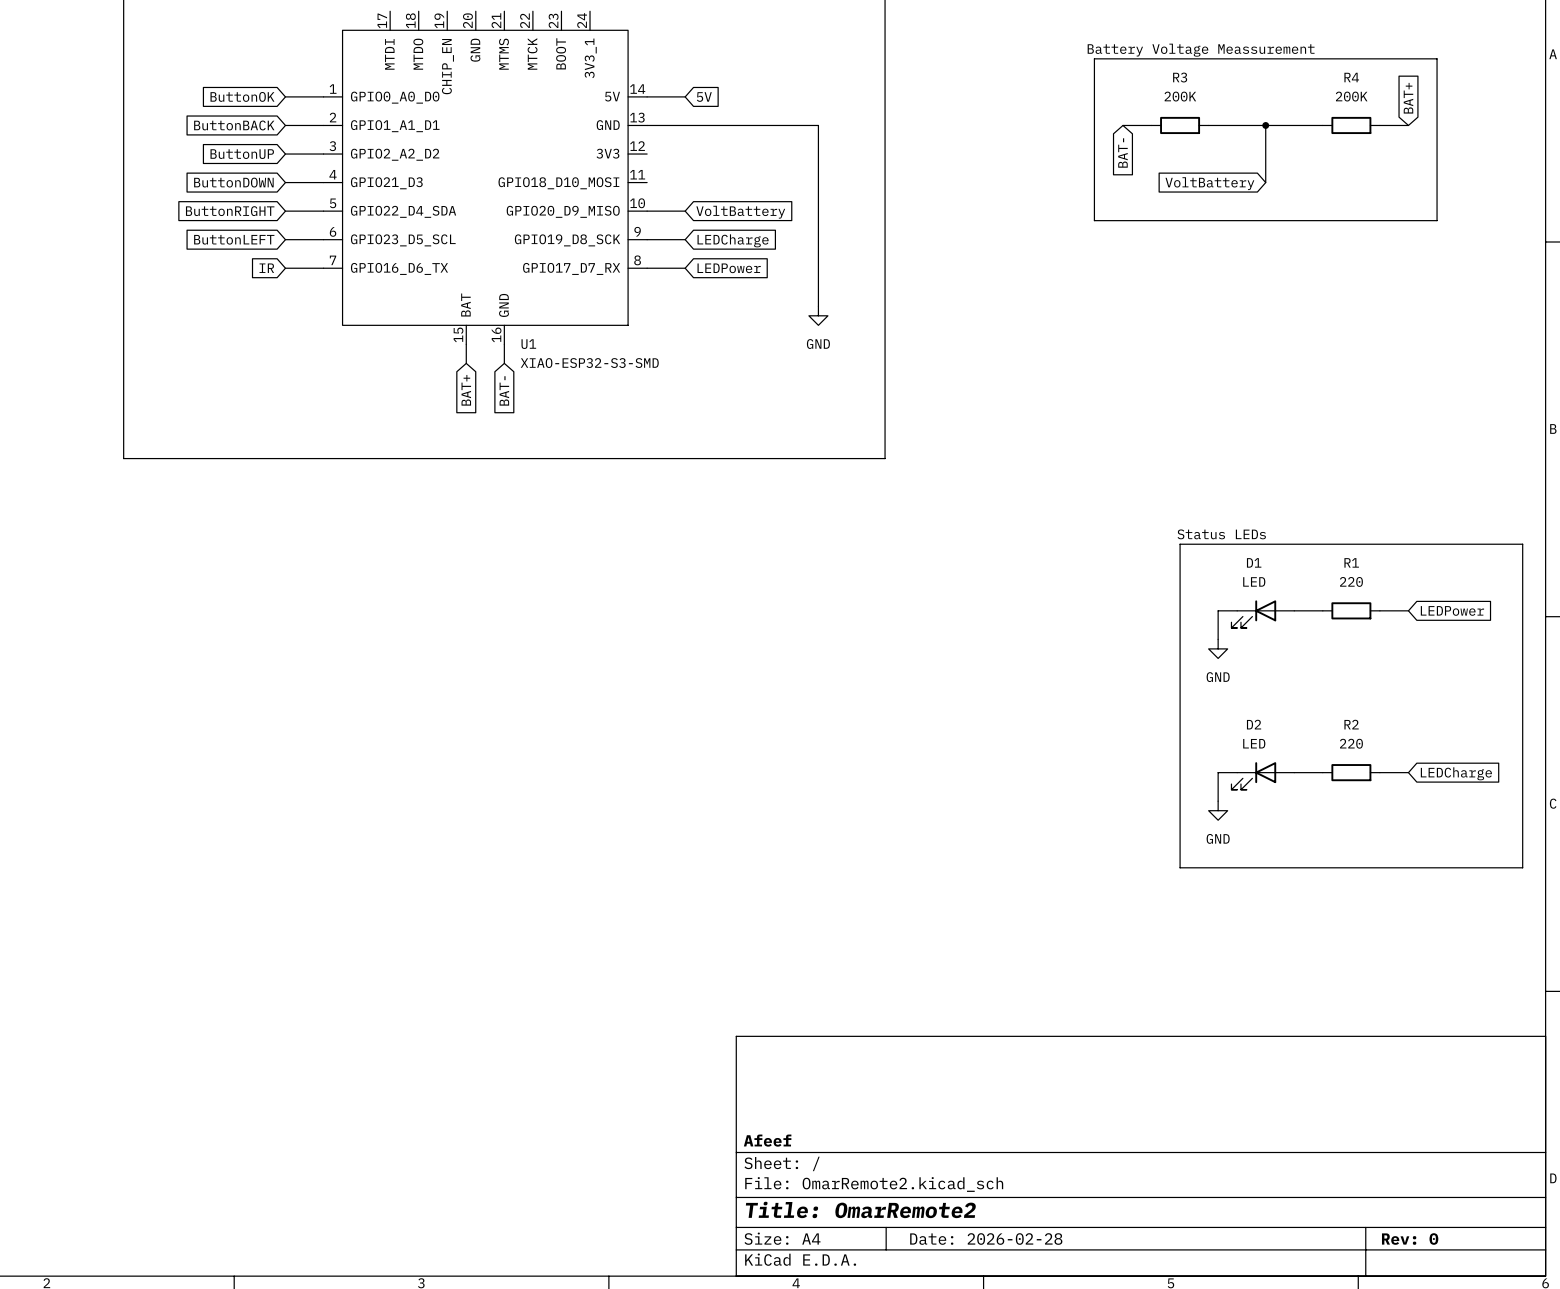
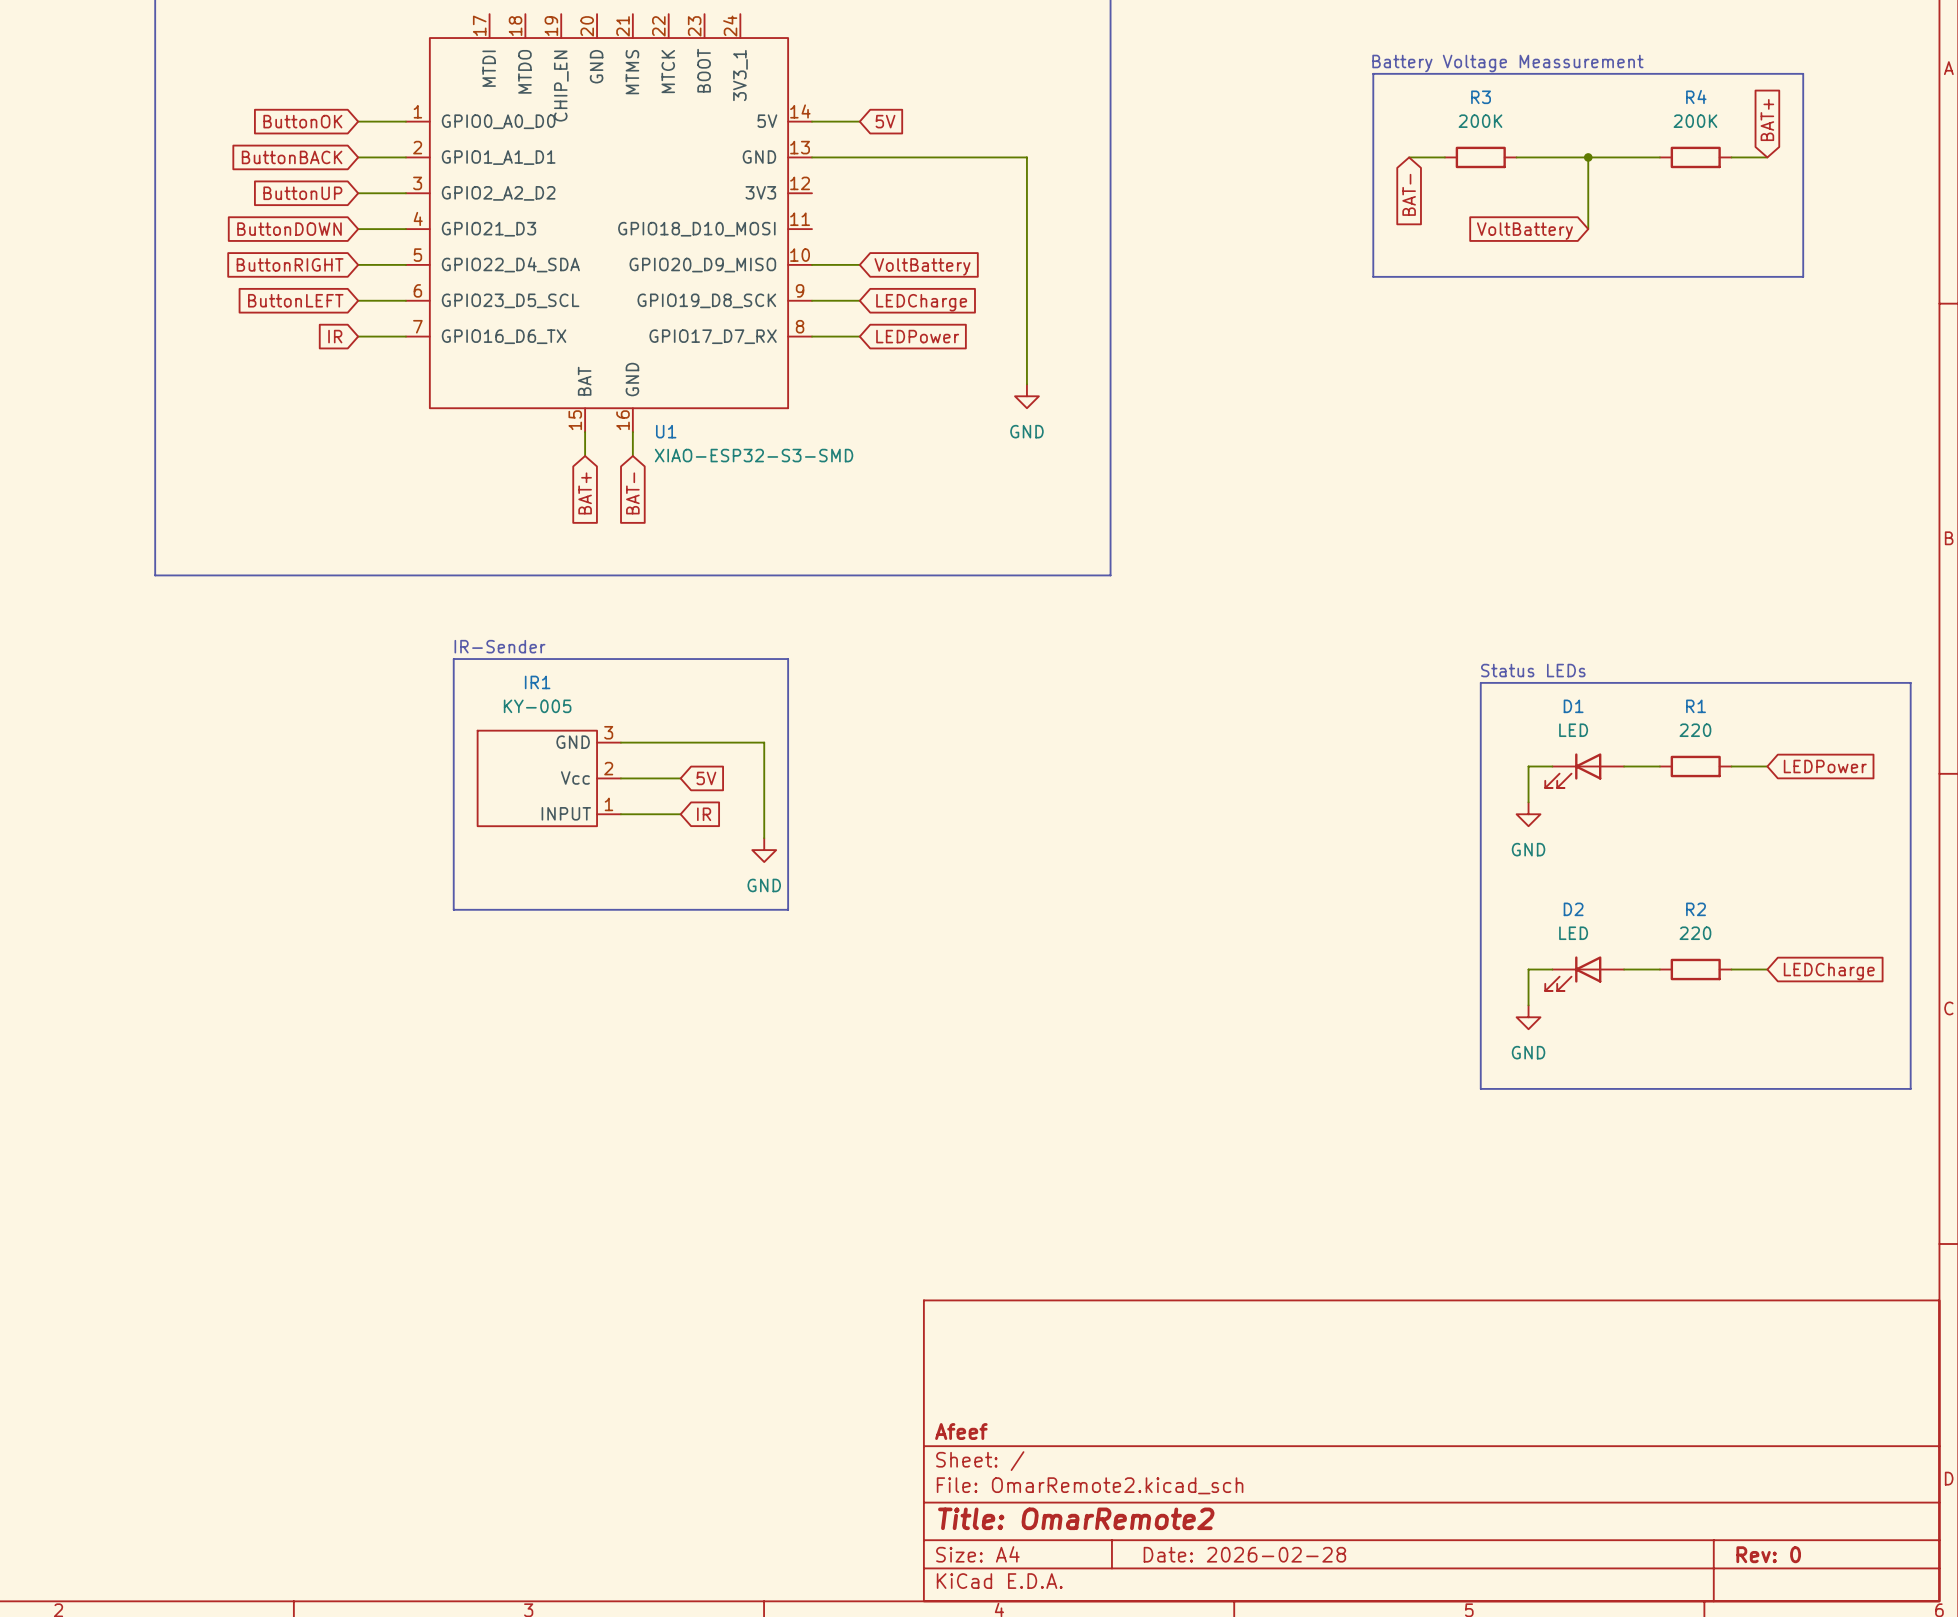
text: none -> IR-Sender (499, 646)
line: none -> (453, 659) (788, 659) (788, 909) (453, 909) (453, 659)
wire: none -> (620, 742) (764, 742) (764, 838)
IR1: none -> KY-005 (549, 778)
wire: none -> (620, 778) (680, 778)
global label: none -> 5V (706, 778)
wire: none -> (620, 814) (680, 814)
global label: none -> IR (704, 814)
power symbol: none -> GND (764, 850)

